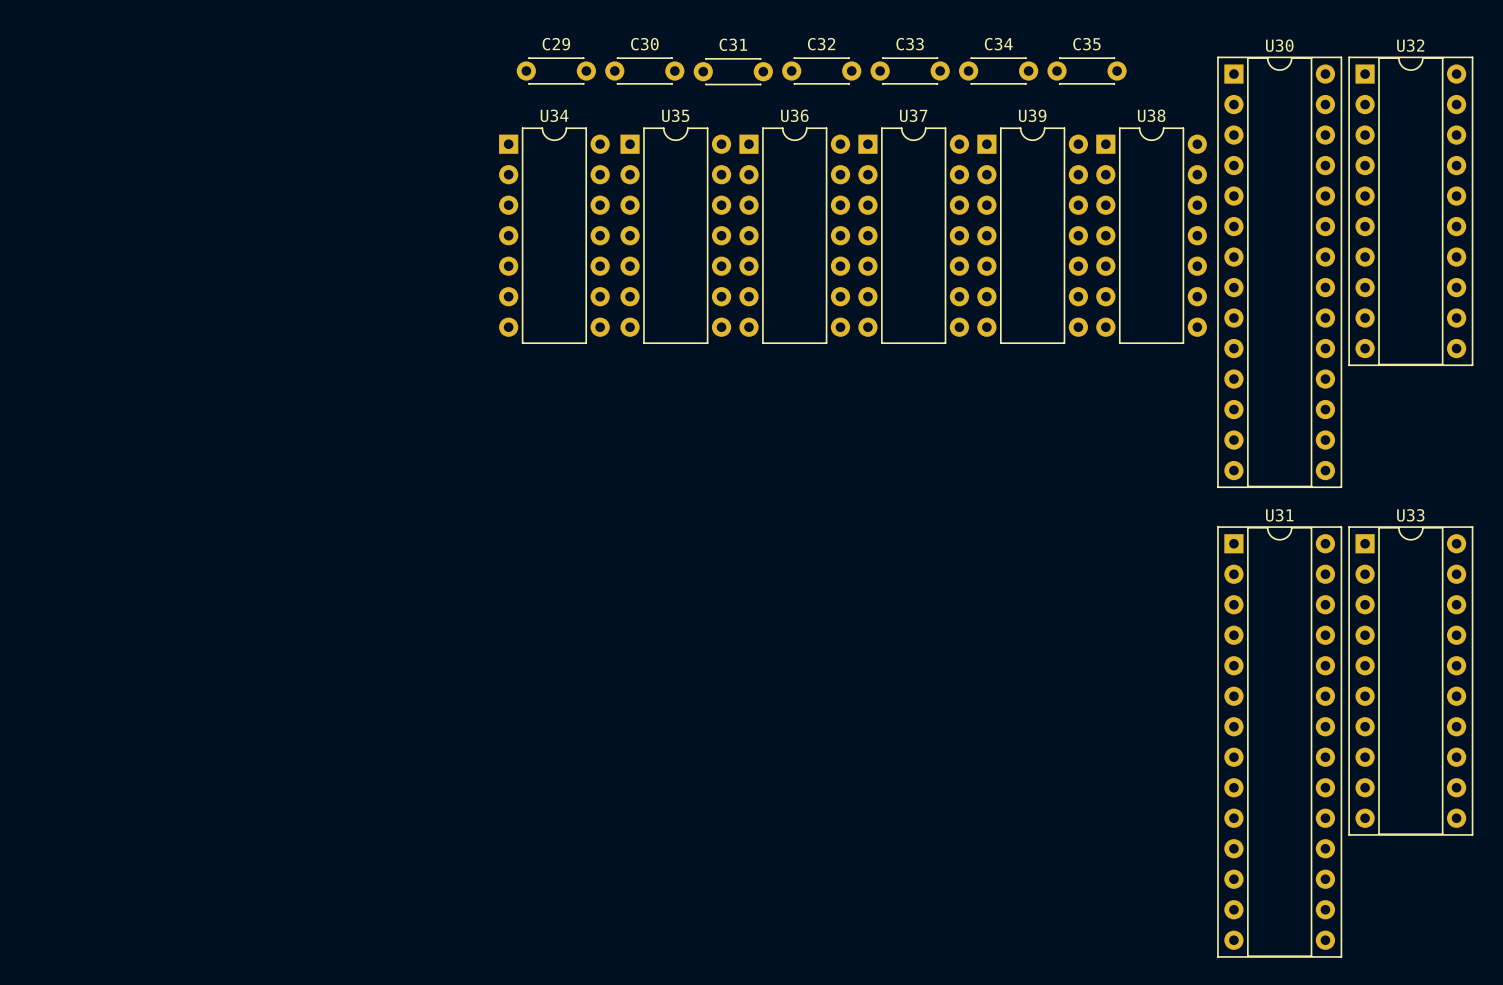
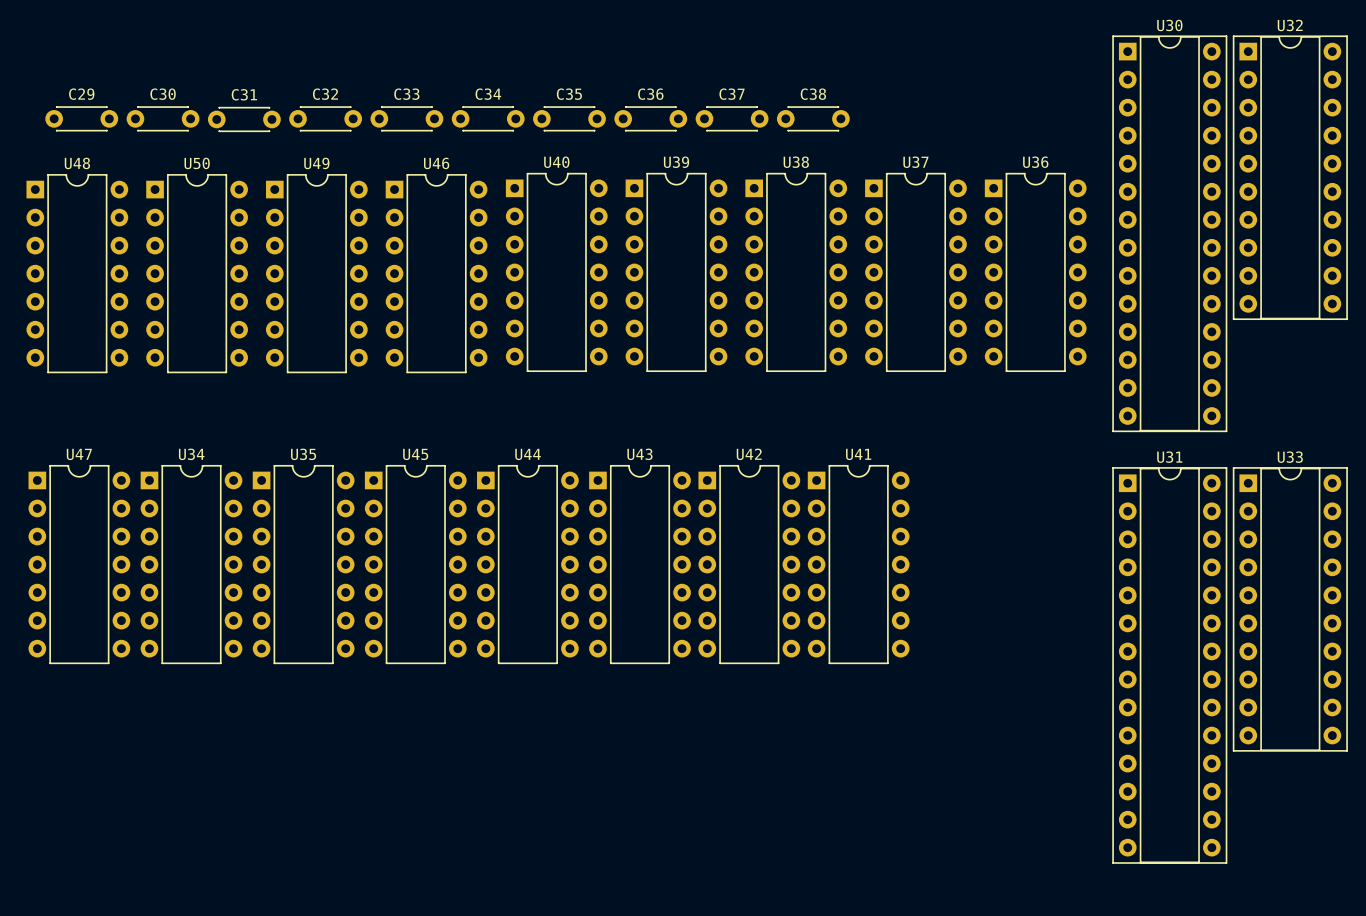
C29 position: (556, 71) -> (81, 118)
C30 position: (644, 71) -> (163, 118)
C31 position: (733, 71) -> (244, 119)
C32 position: (821, 71) -> (325, 118)
C33 position: (910, 71) -> (406, 118)
C34 position: (998, 71) -> (488, 118)
C35 position: (1087, 71) -> (569, 118)
C36: none -> (650, 118)
C37: none -> (732, 118)
C38: none -> (813, 118)
U34 position: (554, 235) -> (191, 564)
U35 position: (675, 235) -> (303, 564)
U36 position: (794, 235) -> (1035, 272)
U37 position: (913, 235) -> (915, 272)
U39 position: (1032, 235) -> (676, 272)
U38 position: (1151, 235) -> (796, 272)
U40: none -> (556, 272)
U48: none -> (77, 273)
U50: none -> (197, 273)
U49: none -> (316, 273)
U46: none -> (436, 273)
U47: none -> (79, 564)
U45: none -> (415, 564)
U44: none -> (527, 564)
U43: none -> (640, 564)
U42: none -> (749, 564)
U41: none -> (858, 564)

